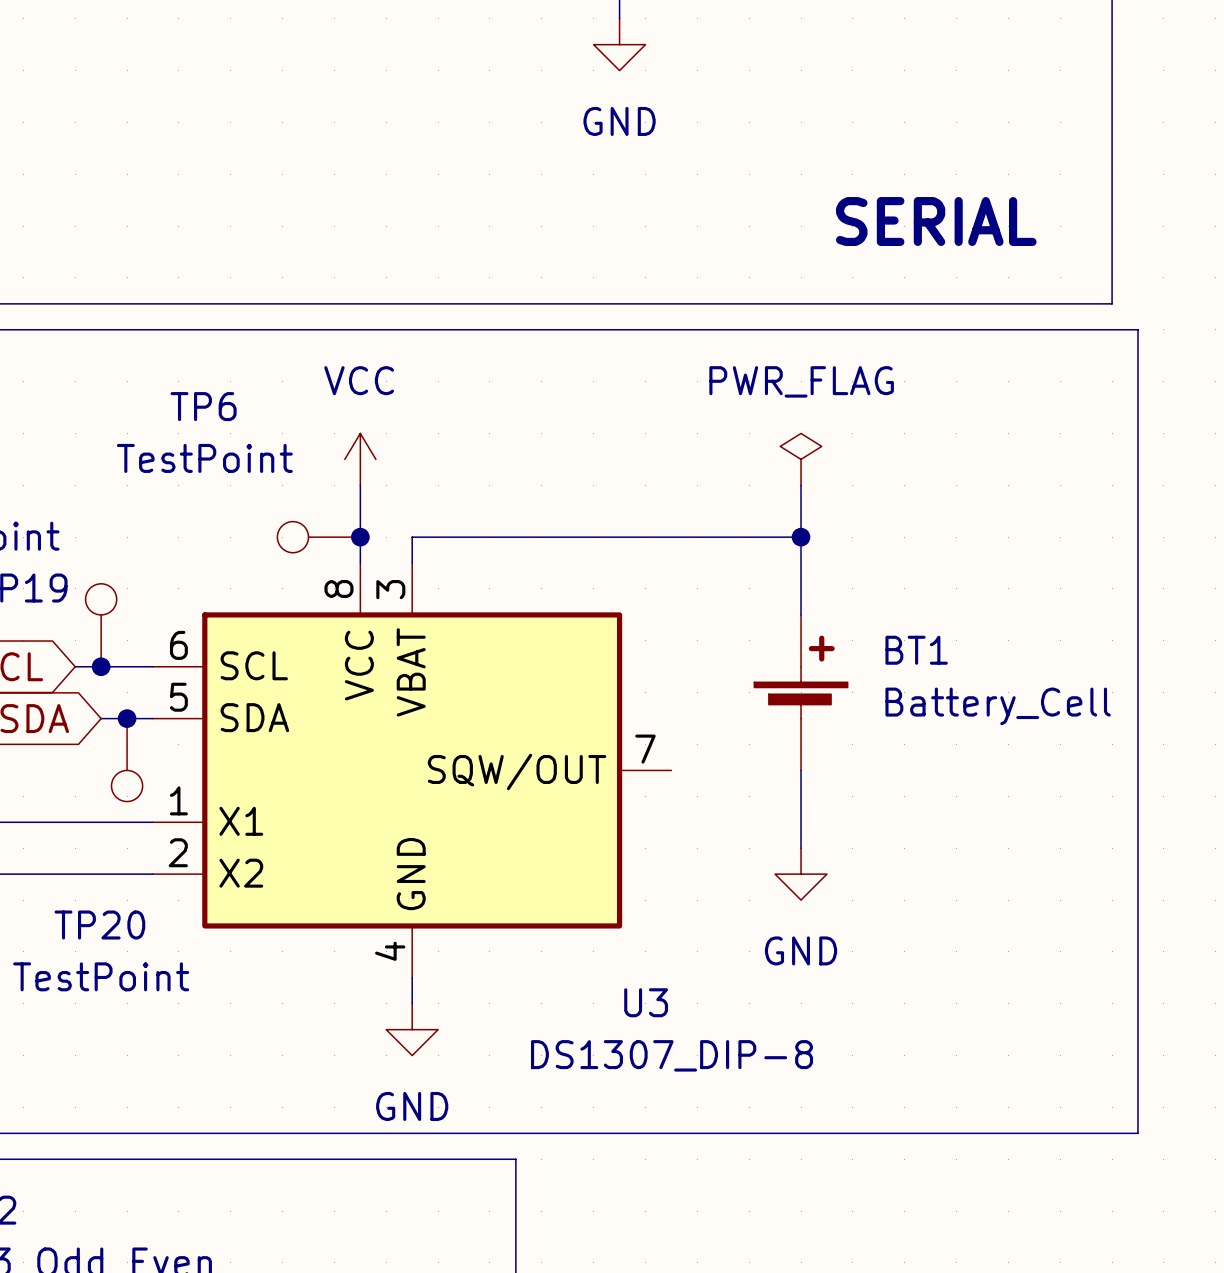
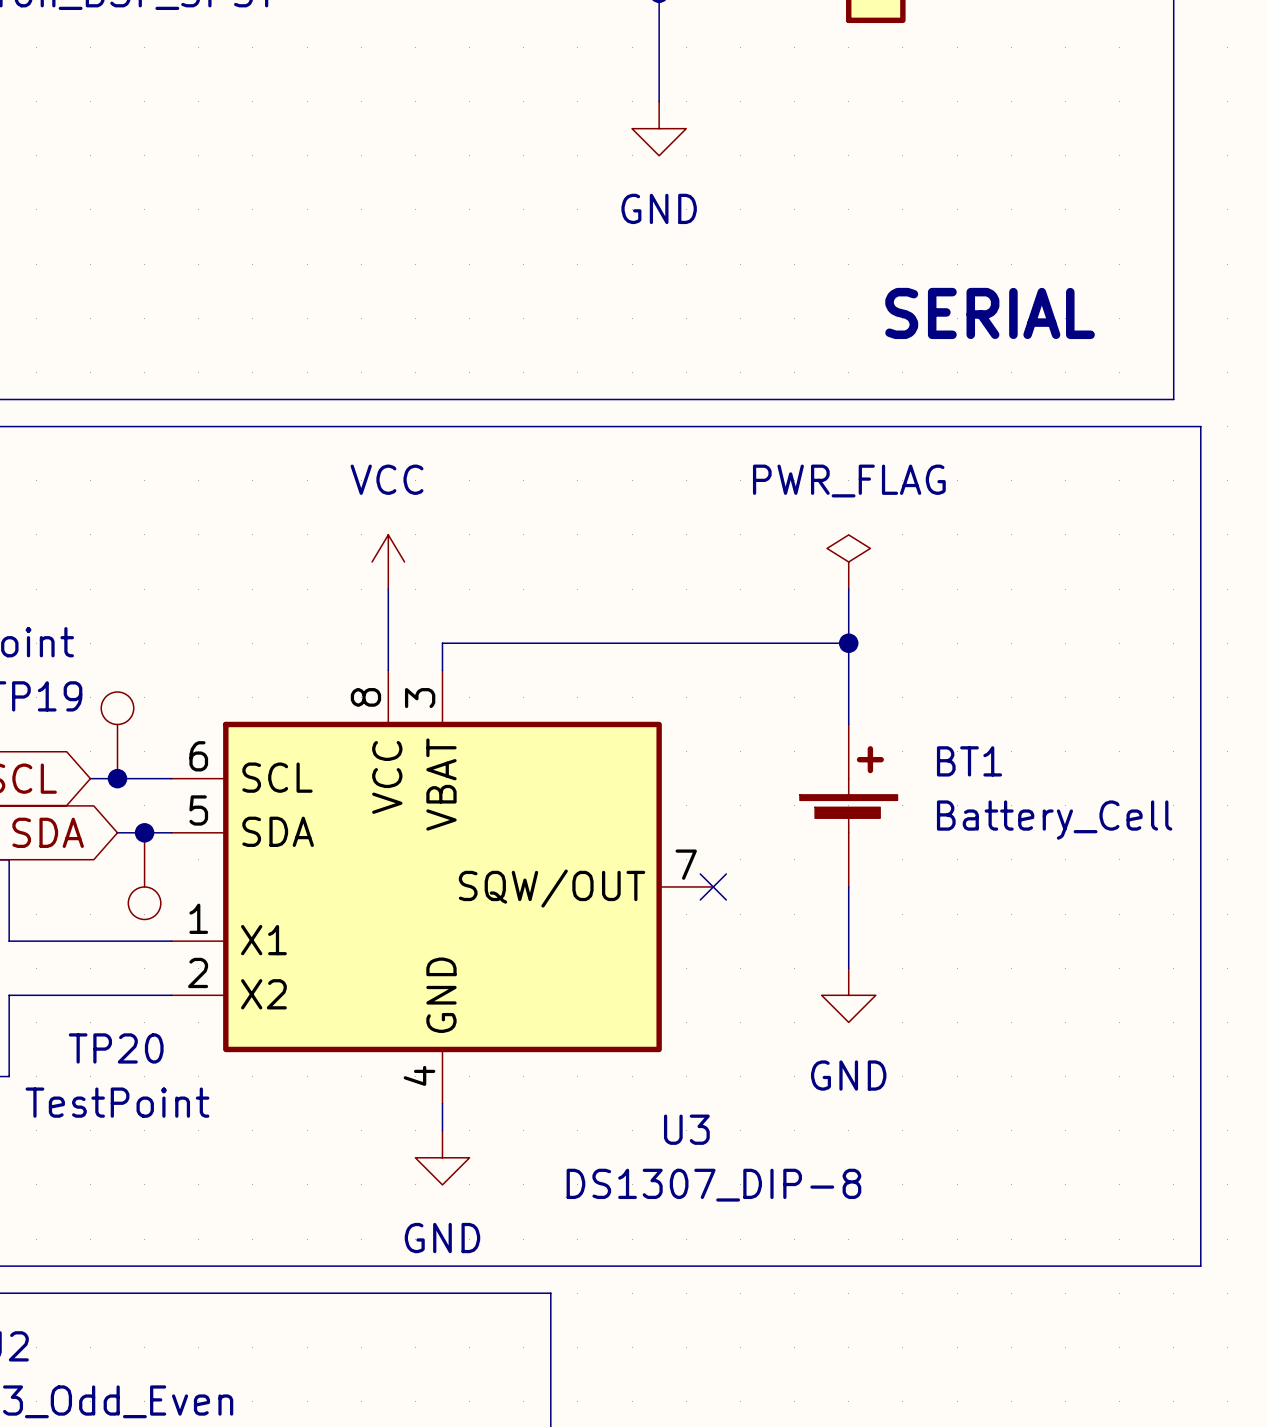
TP6: TestPoint (318, 537) -> none
junction: (360, 537) -> none
no-connect mark: none -> (713, 886)

